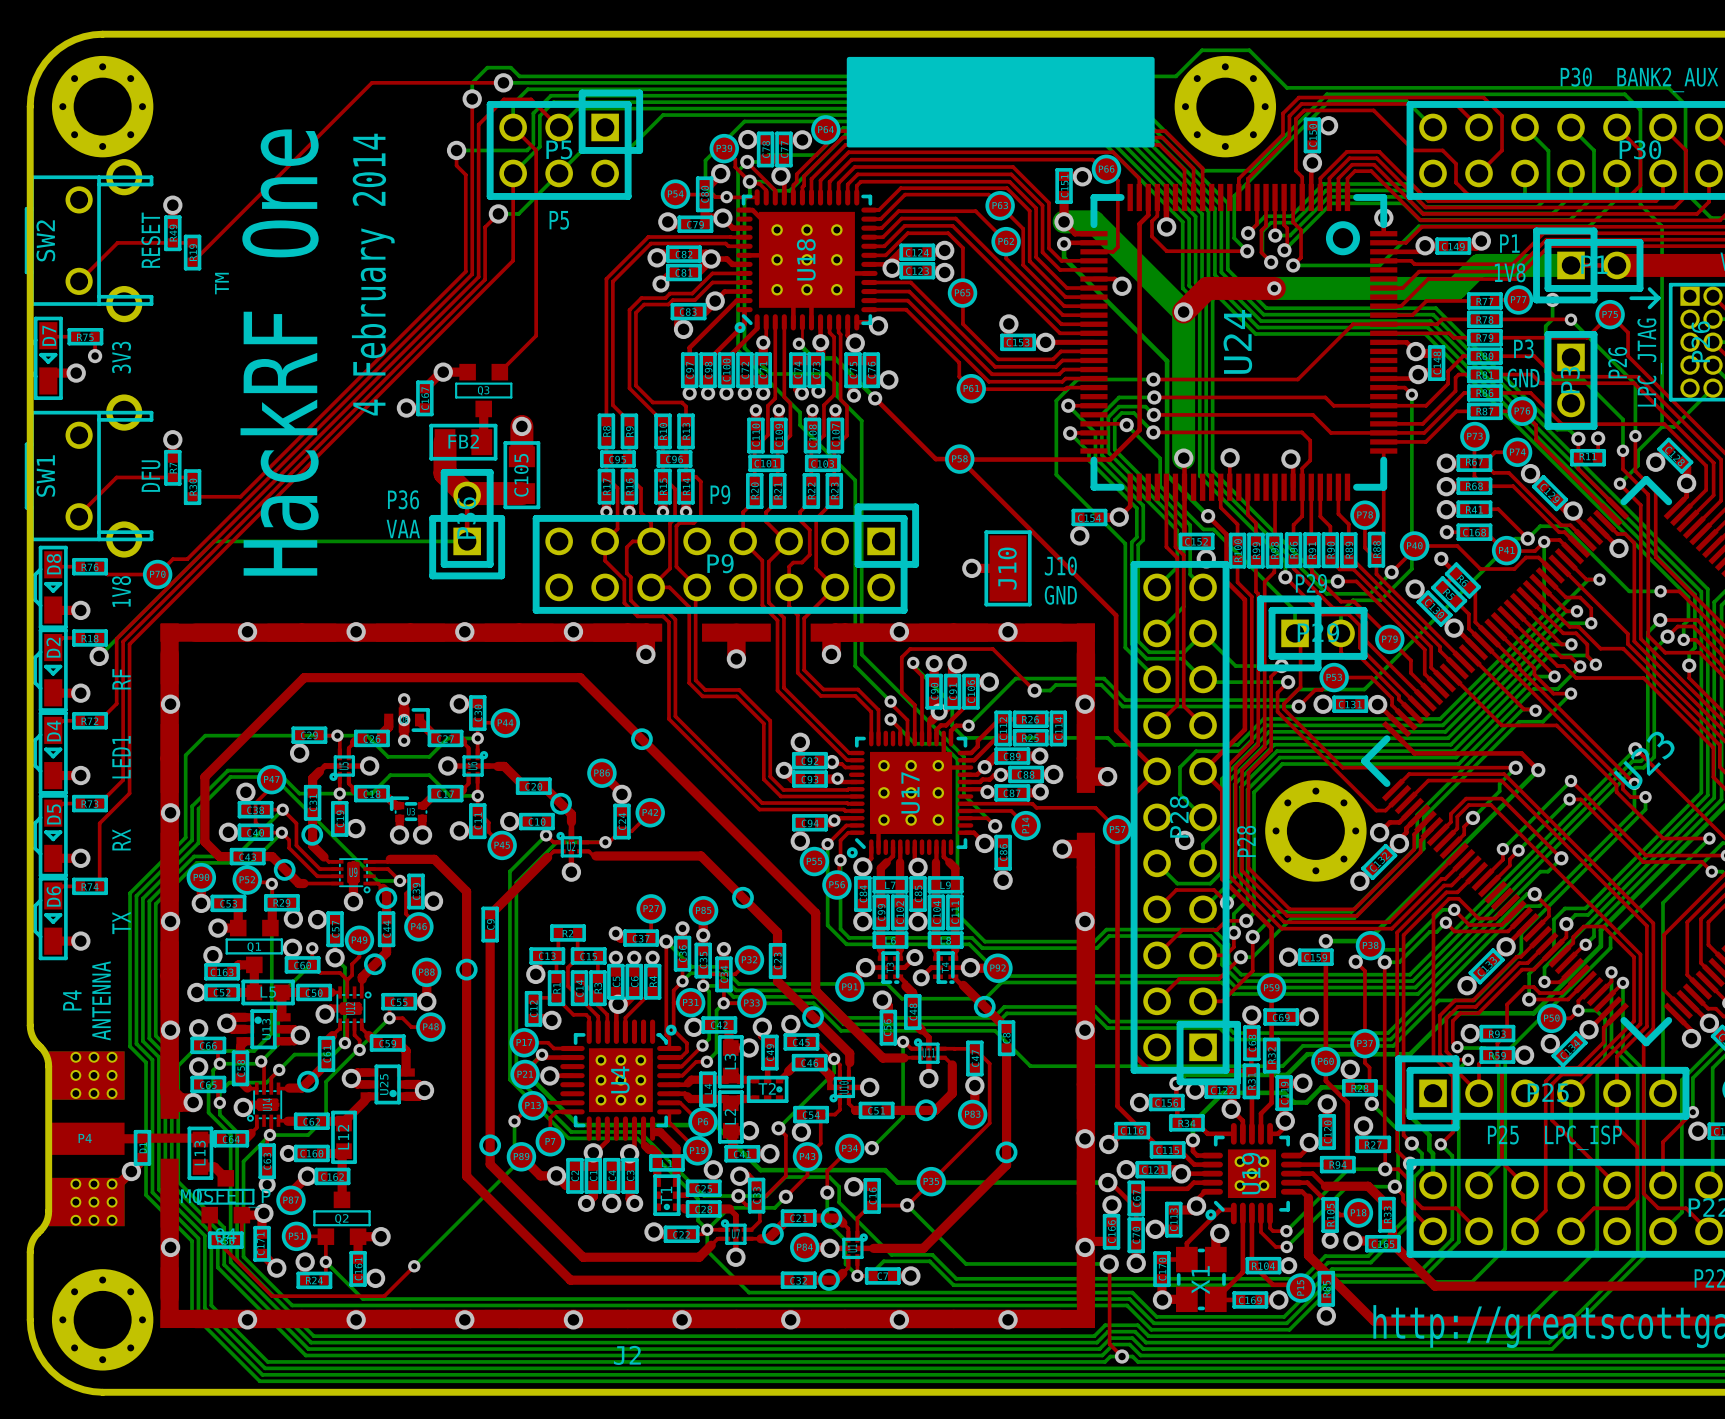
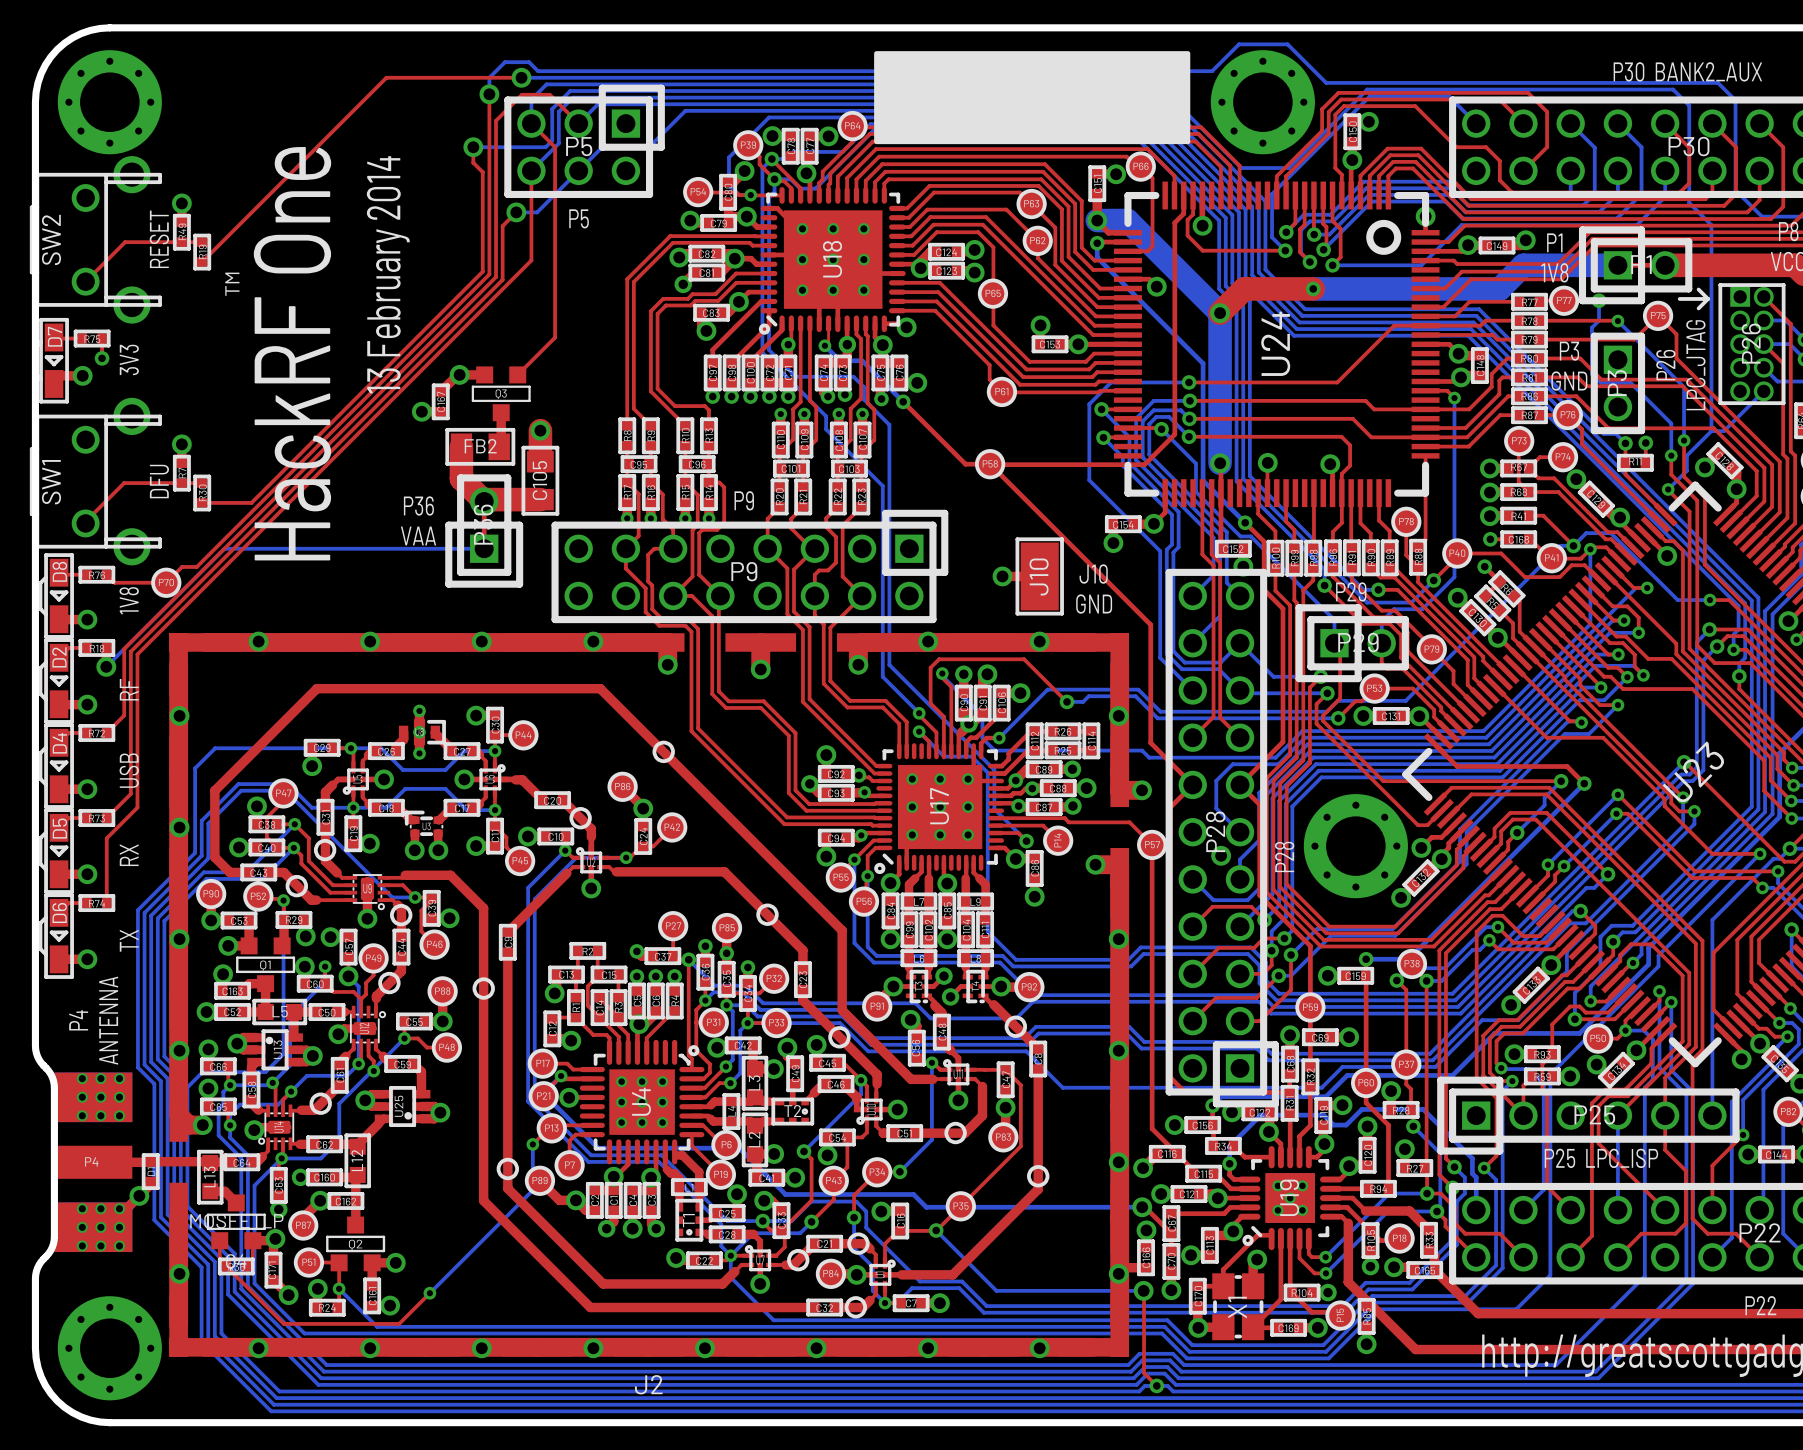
text: 4 February 2014 (373, 274) -> 13 February 2014 (388, 274)
text: LED1 (121, 757) -> USB (129, 770)

